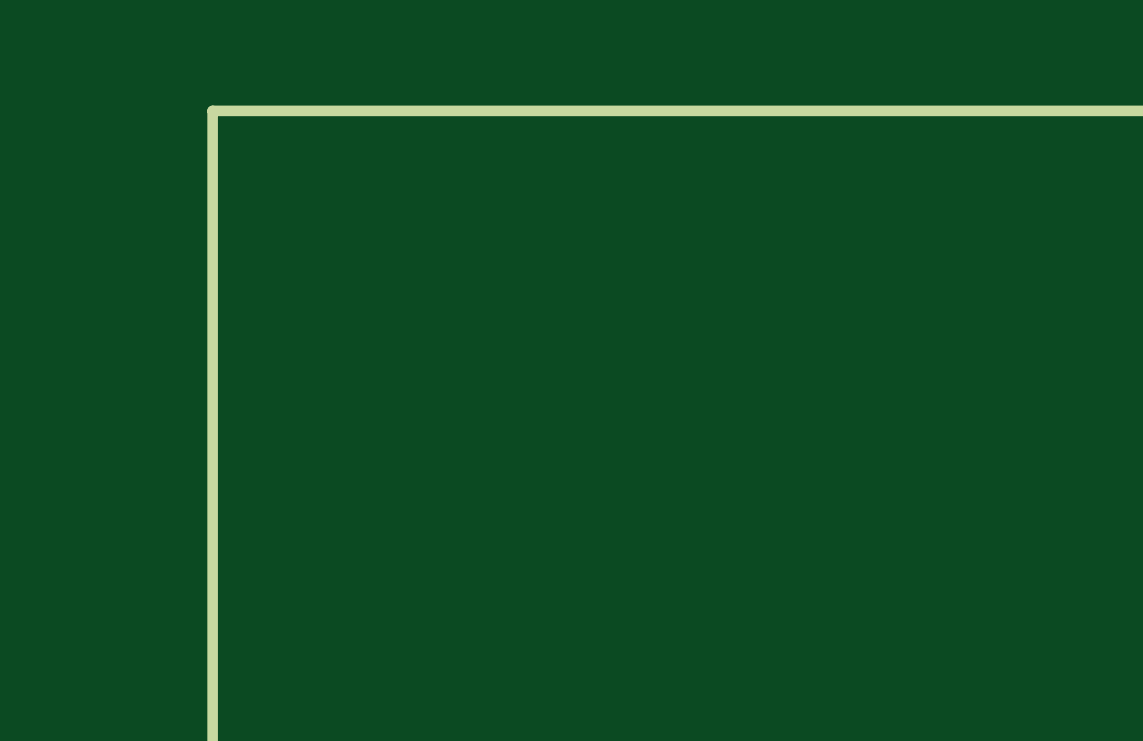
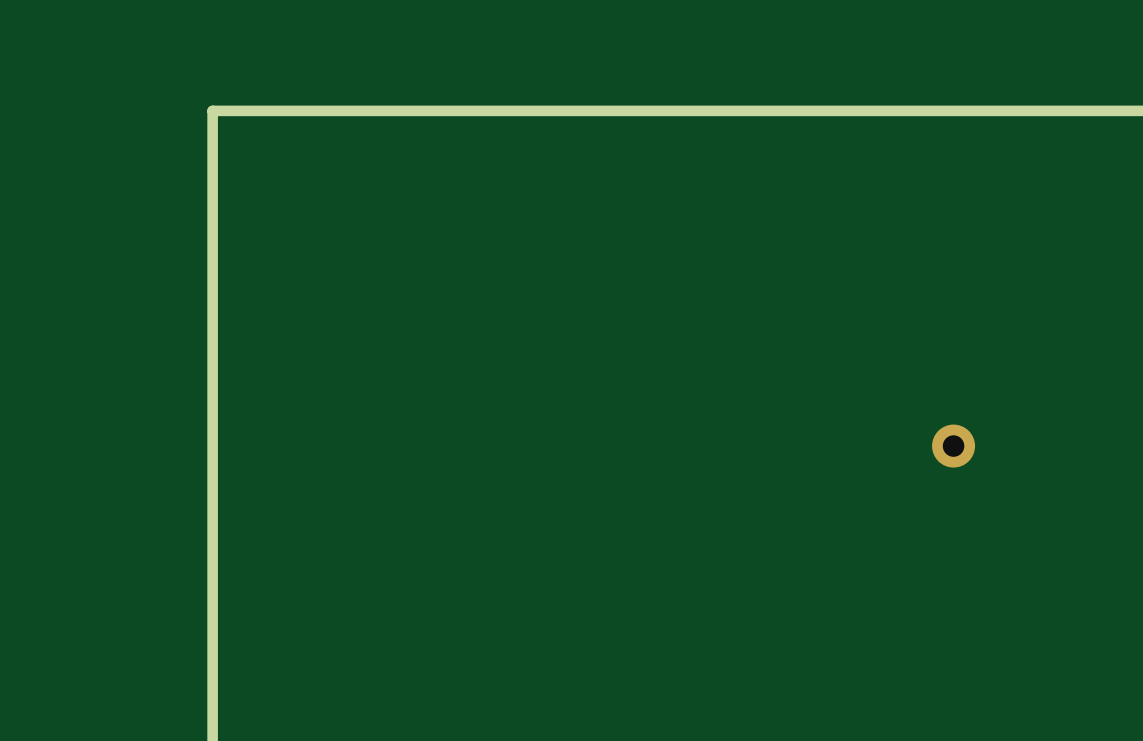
via: none -> (953, 446)

